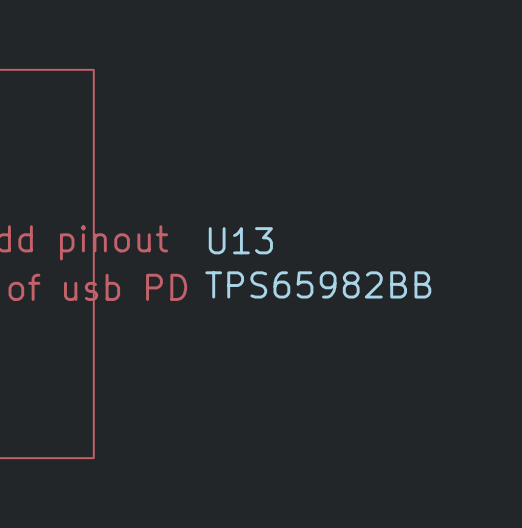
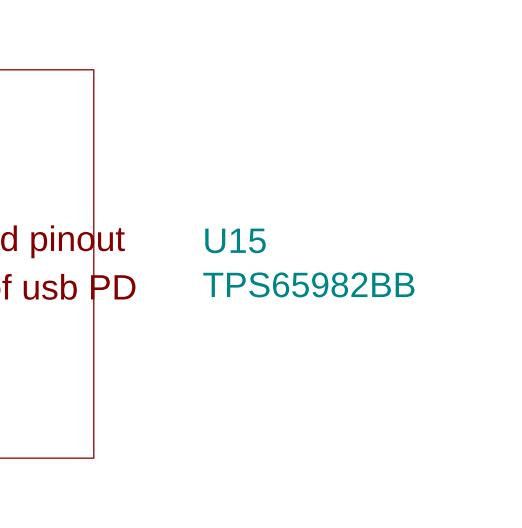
U13 name: U13 (240, 240) -> U15 (235, 240)

